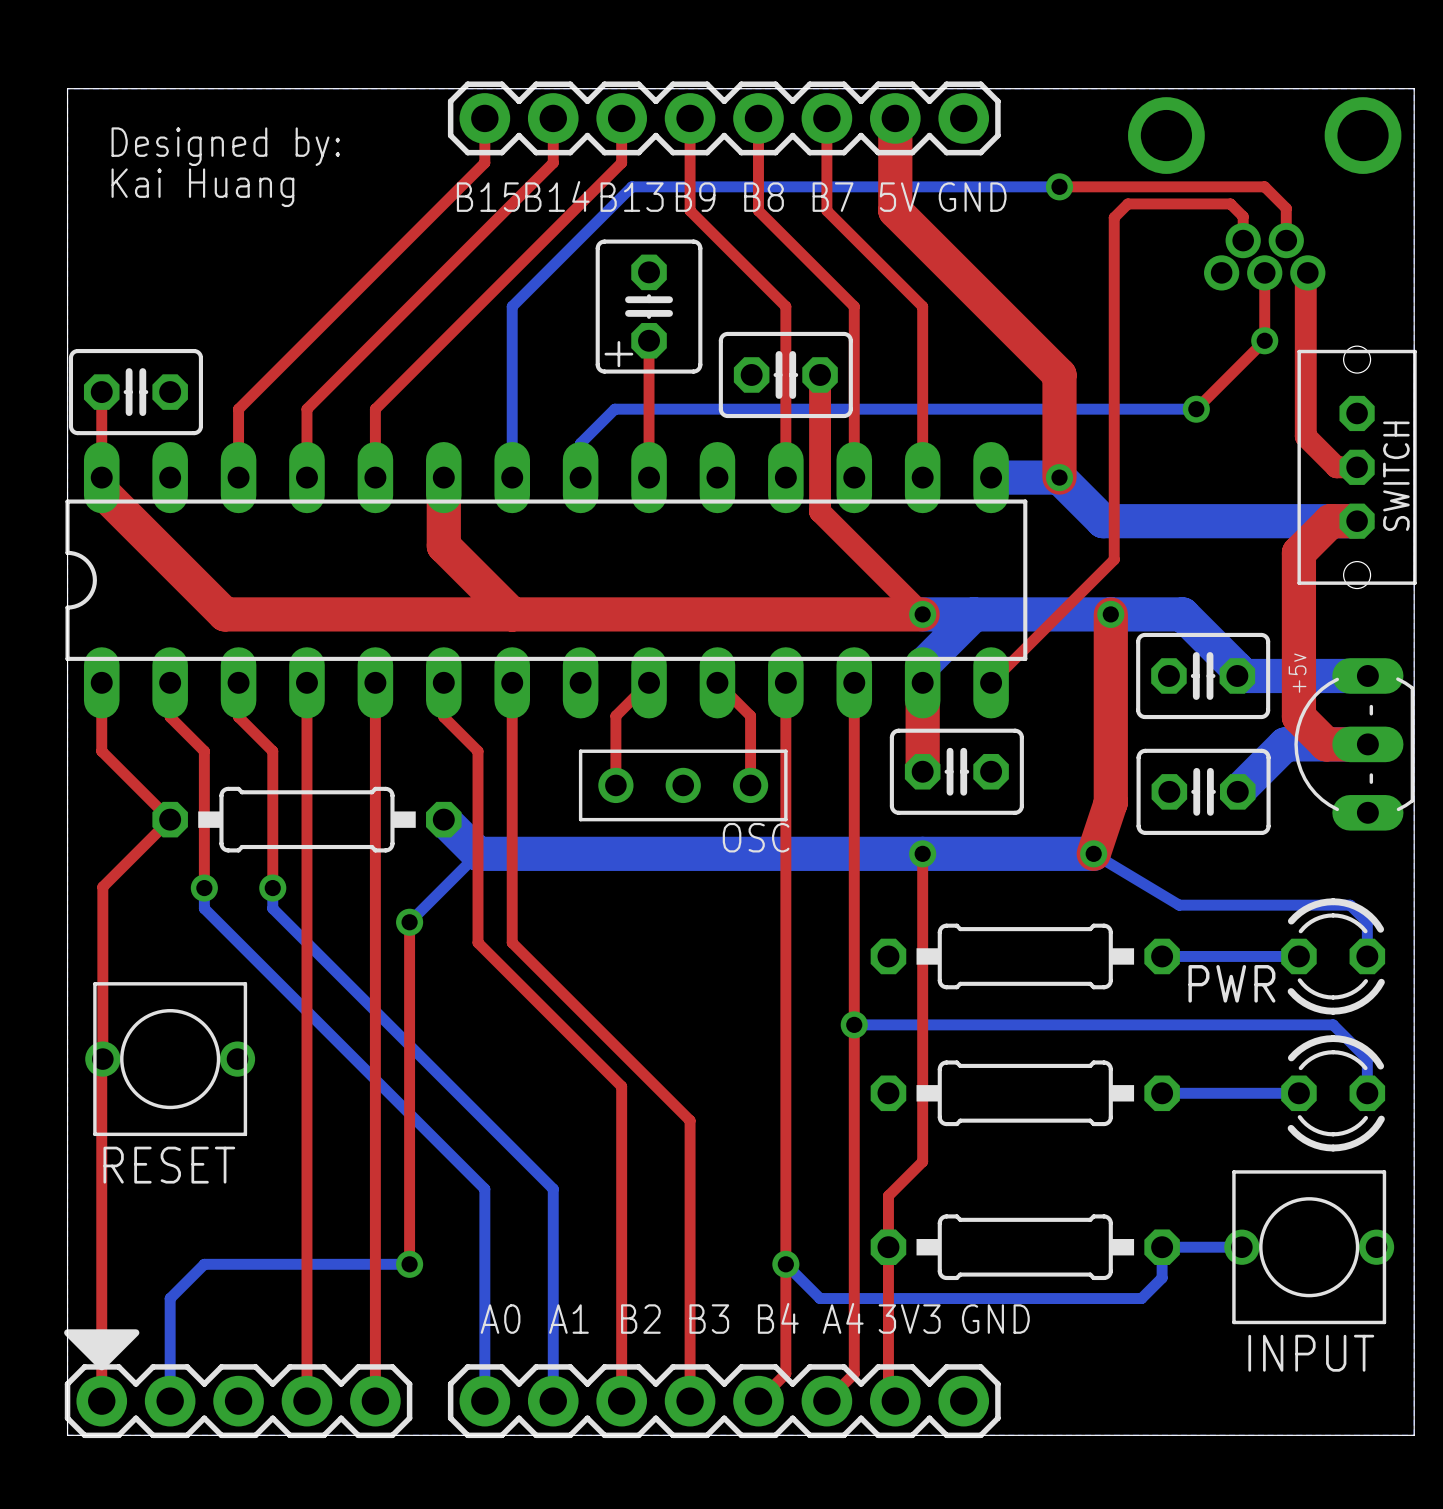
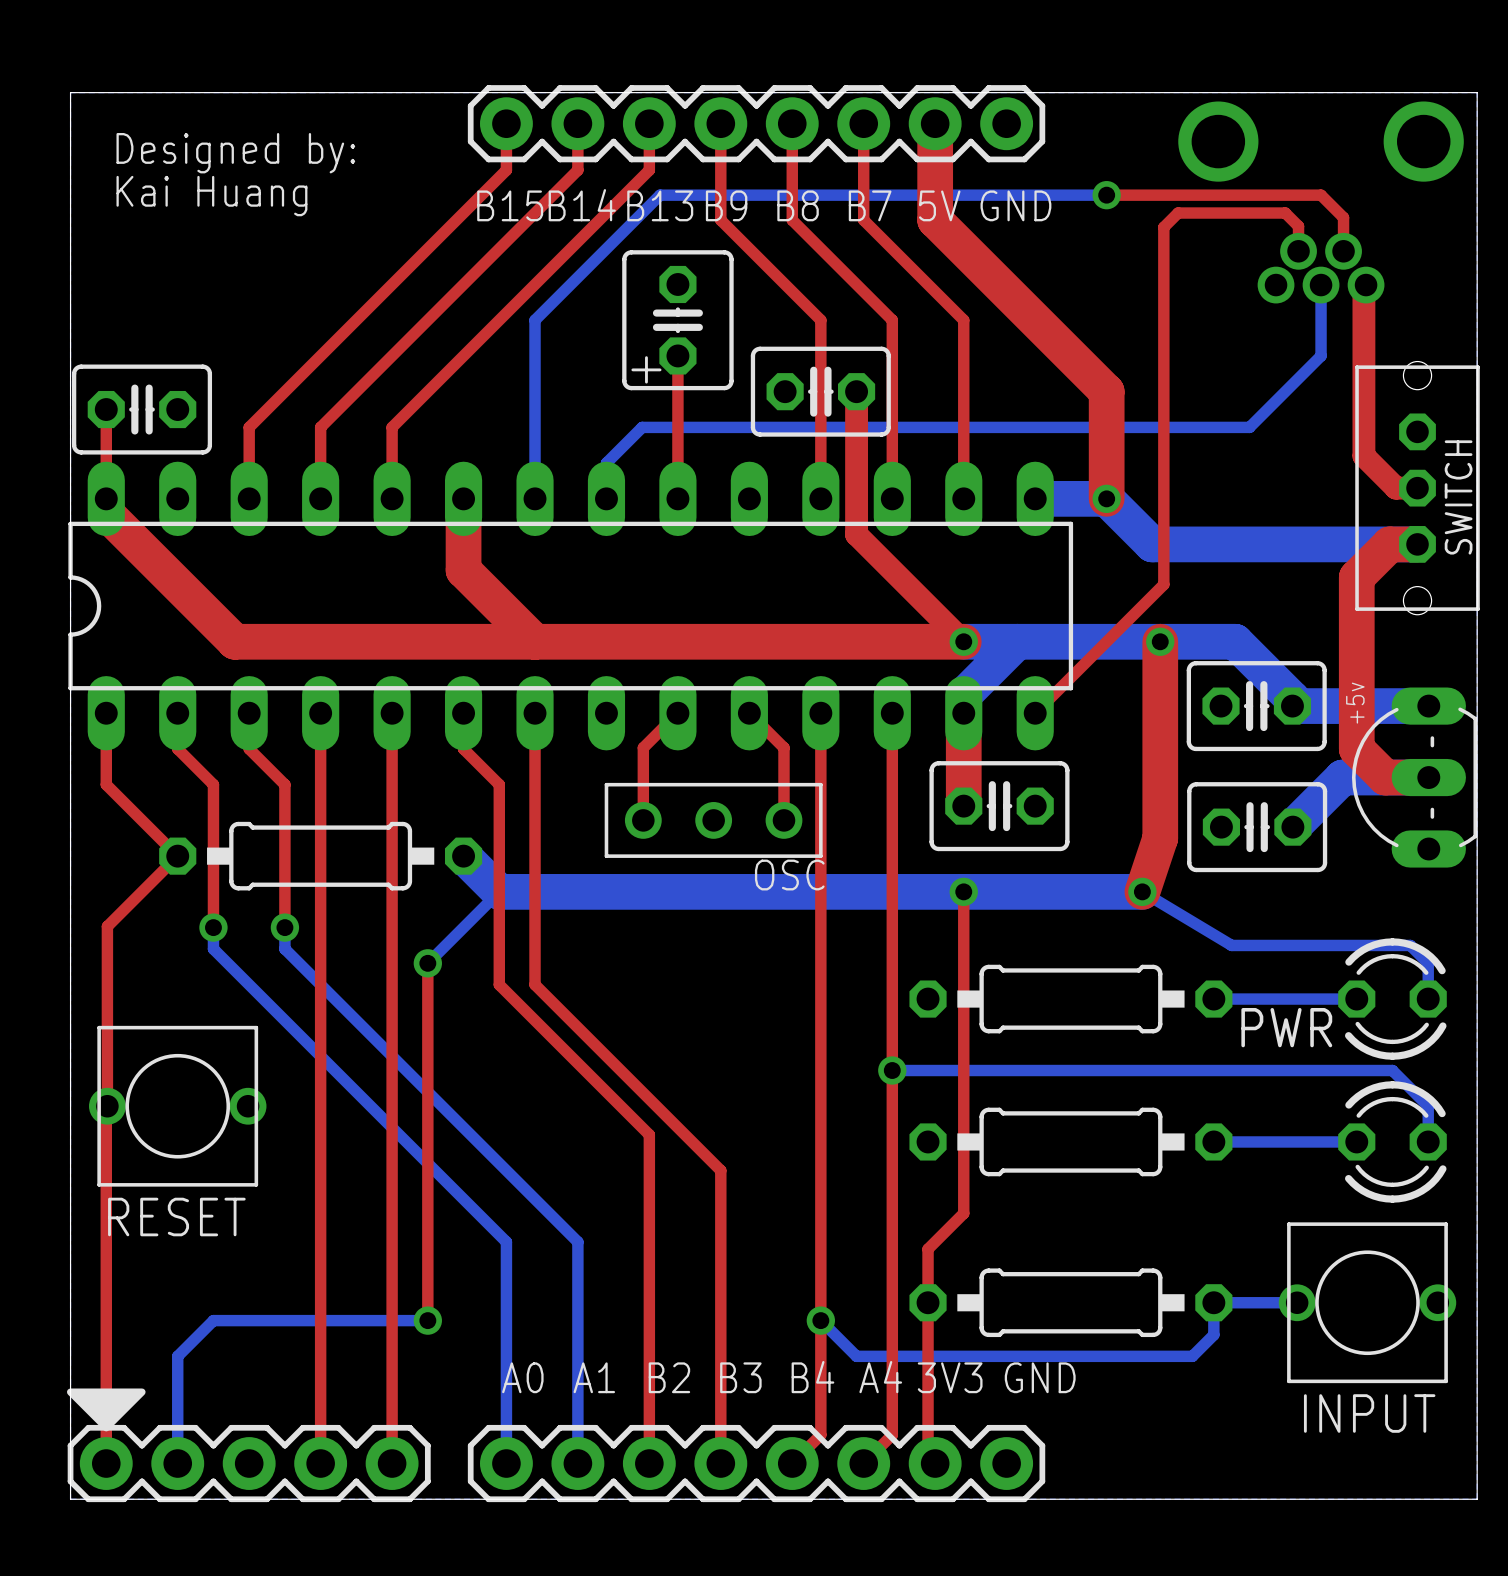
top track: (1264, 272) (1264, 340) (1196, 409) -> none
bottom track: none -> (1321, 285) (1321, 355) (1249, 427)
via: (1264, 340) -> none
via: (1196, 409) -> none

